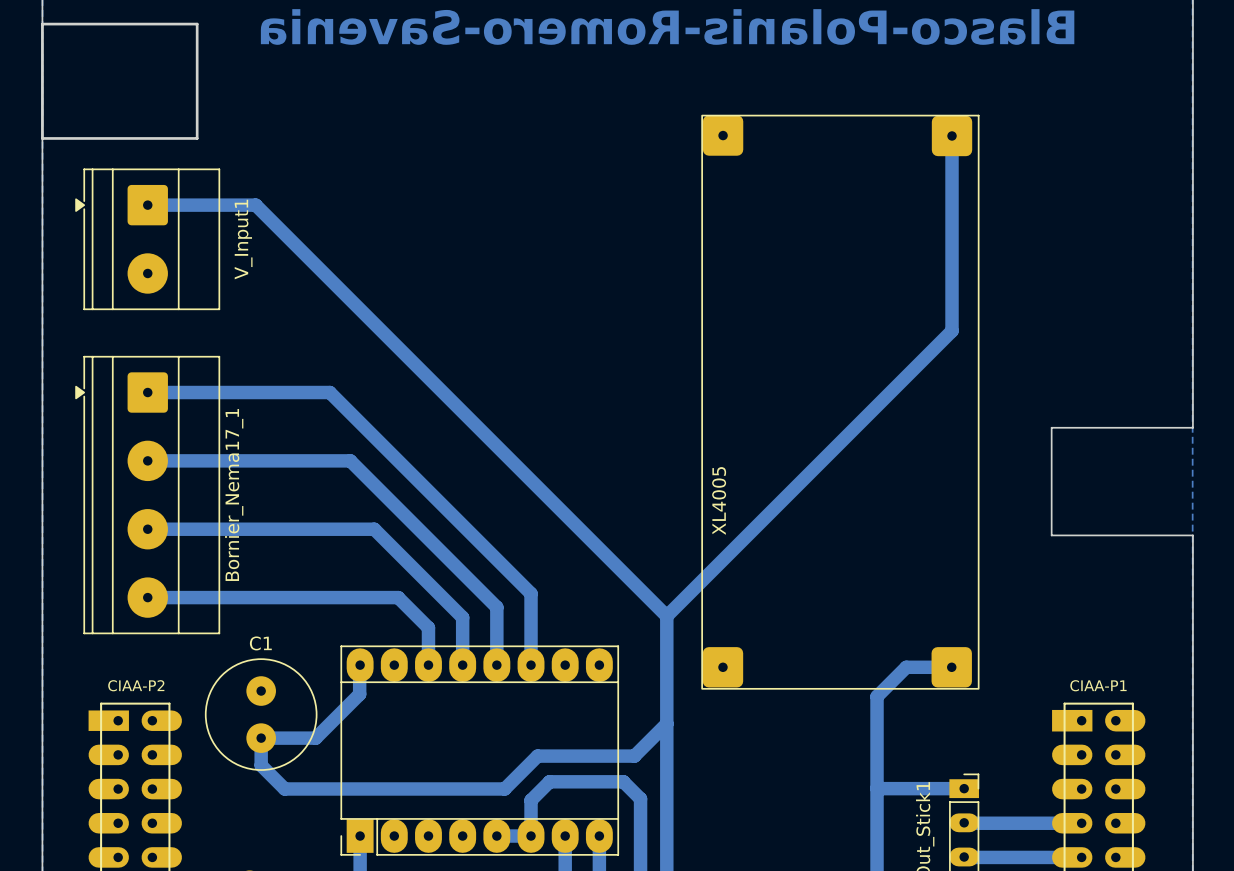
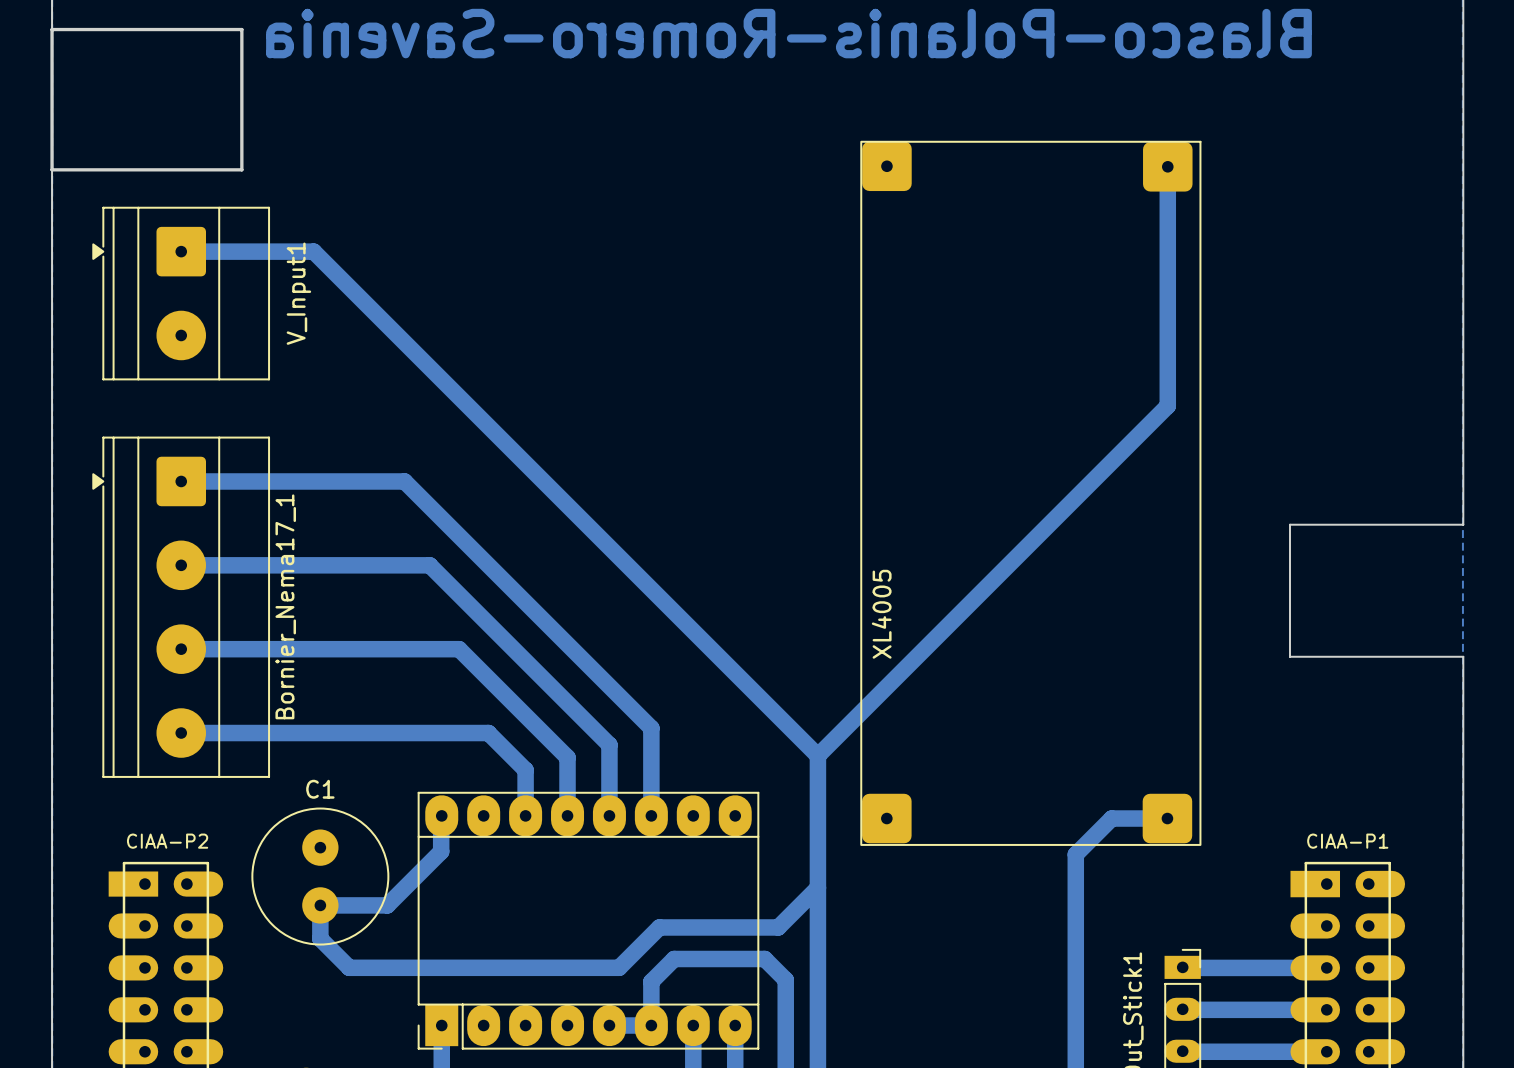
bottom track: (877, 788) (964, 788) -> none
bottom track: none -> (1183, 967) (1326, 967)

